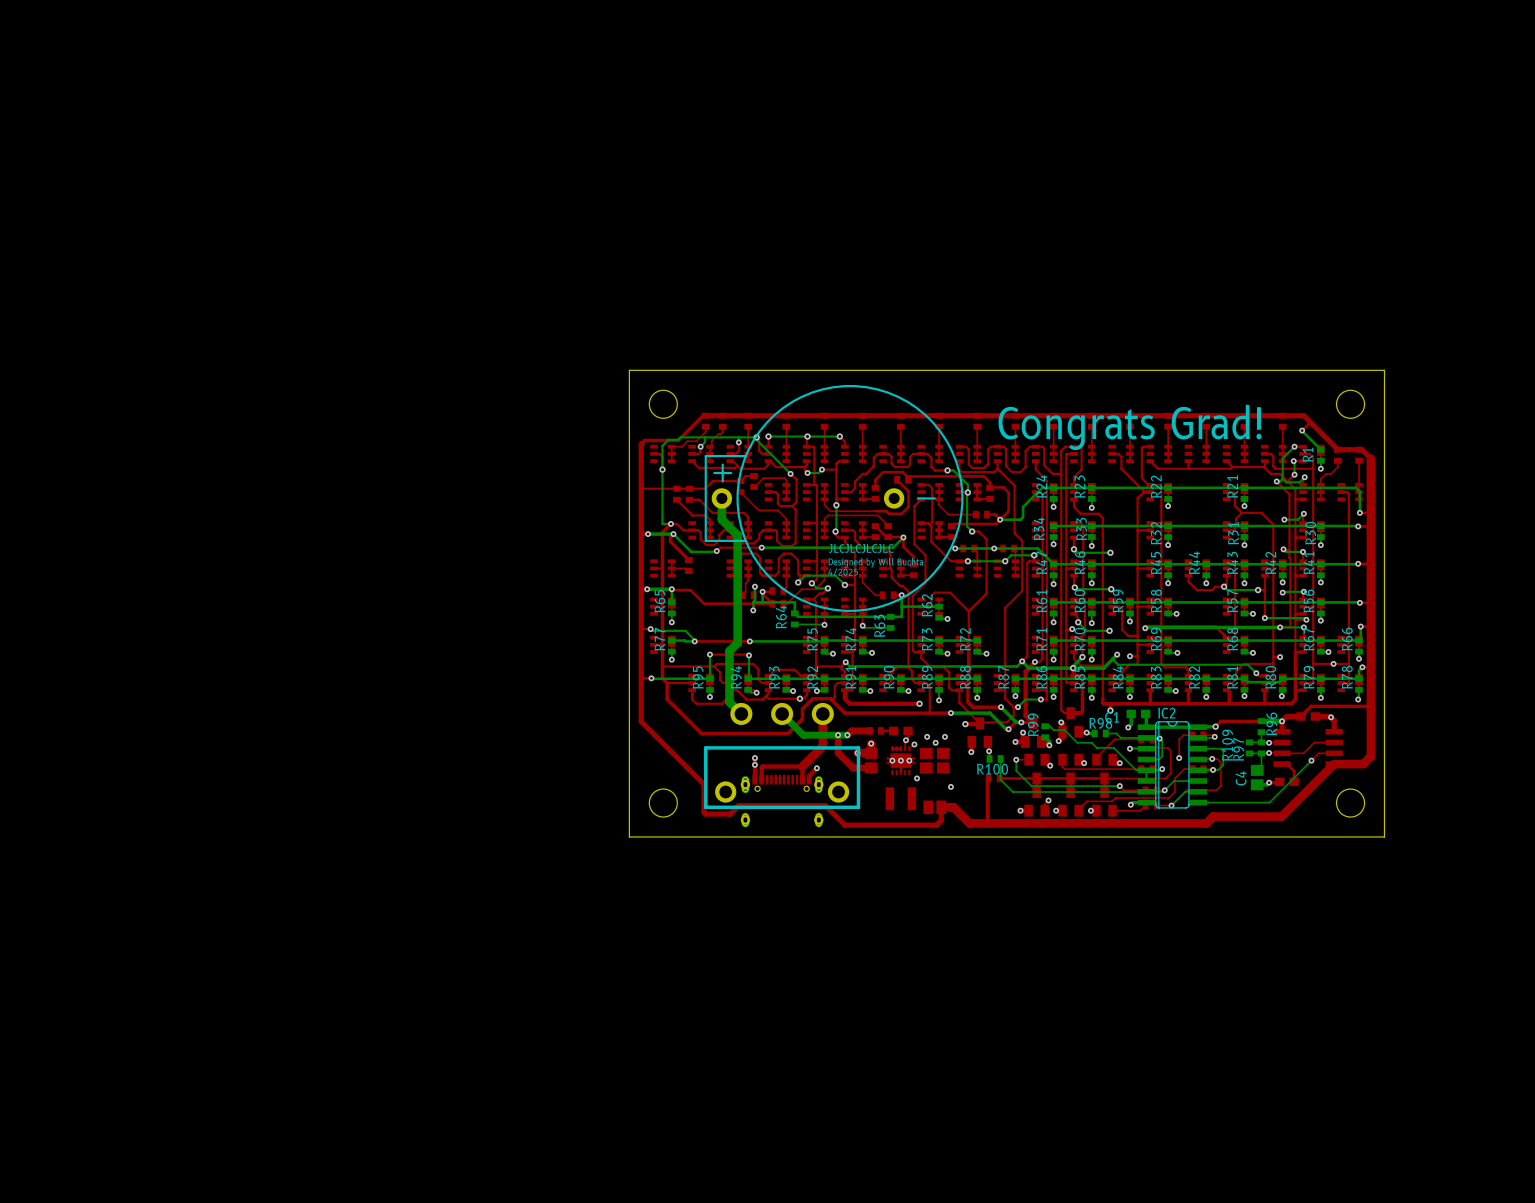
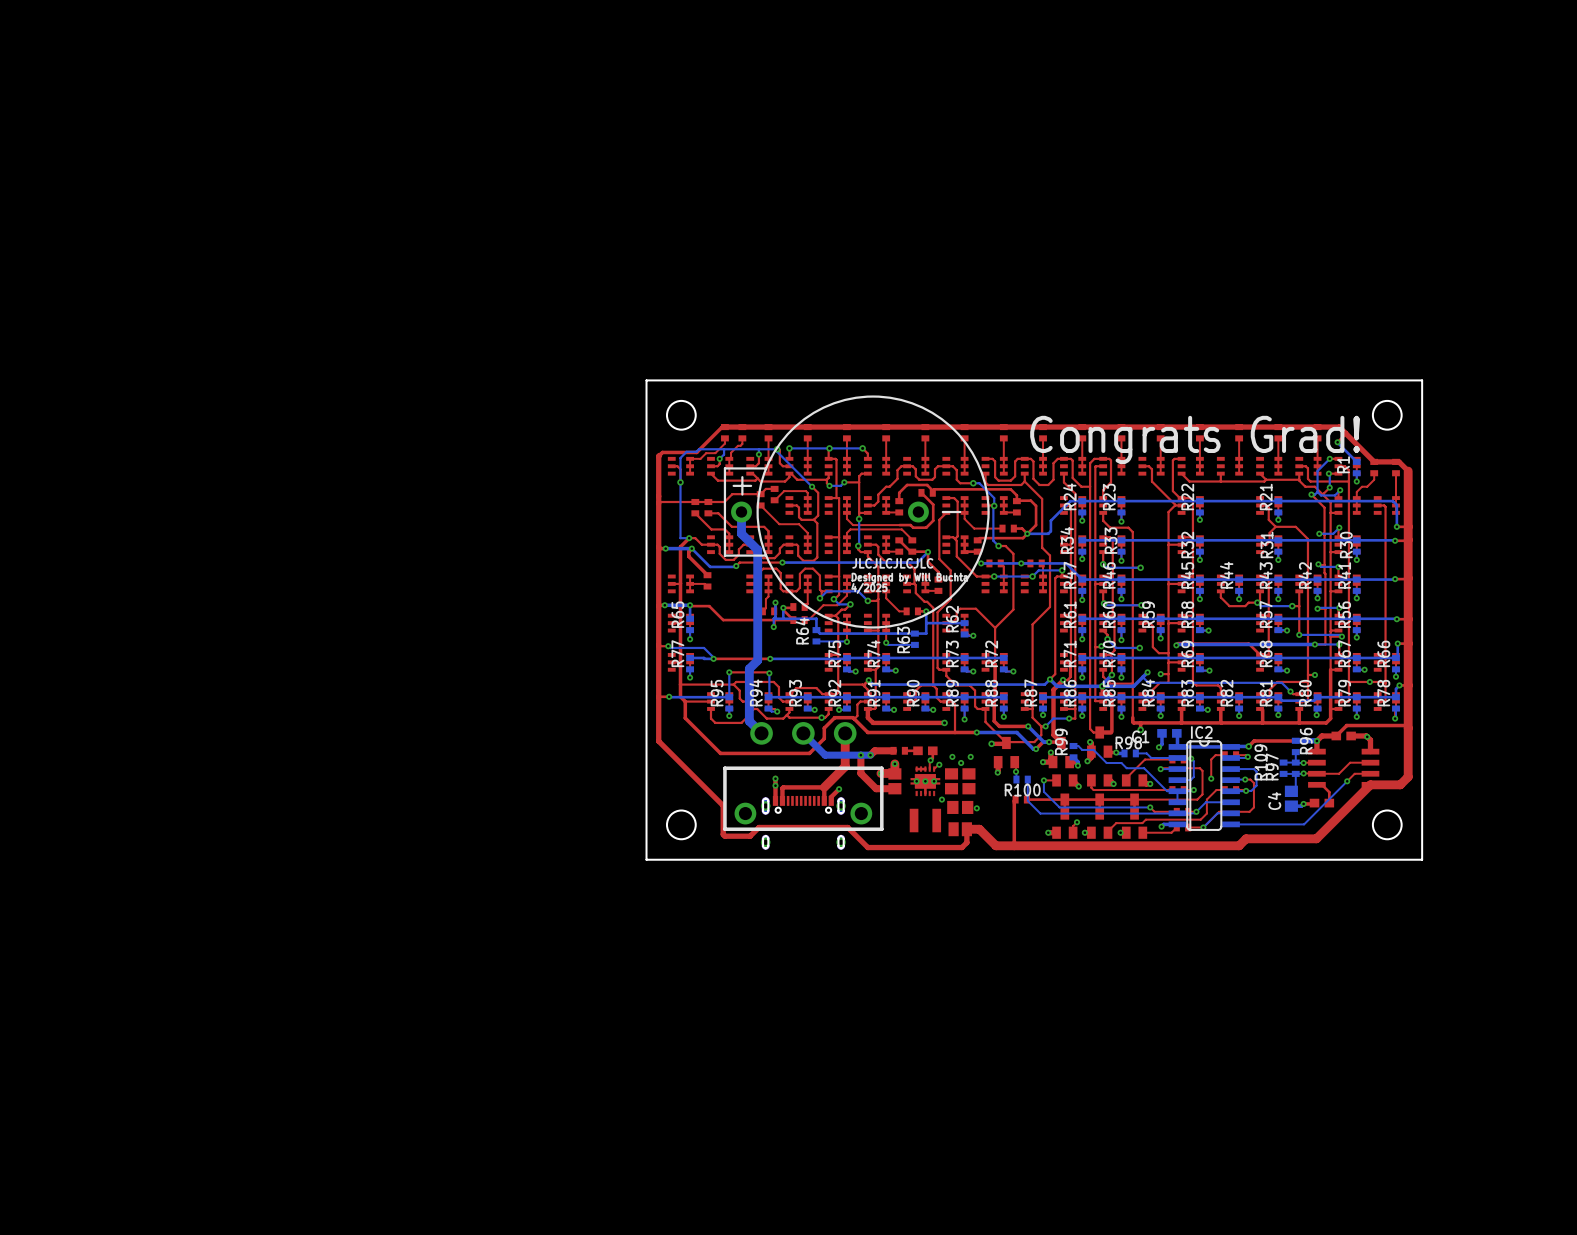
part: none -> (960, 807)

